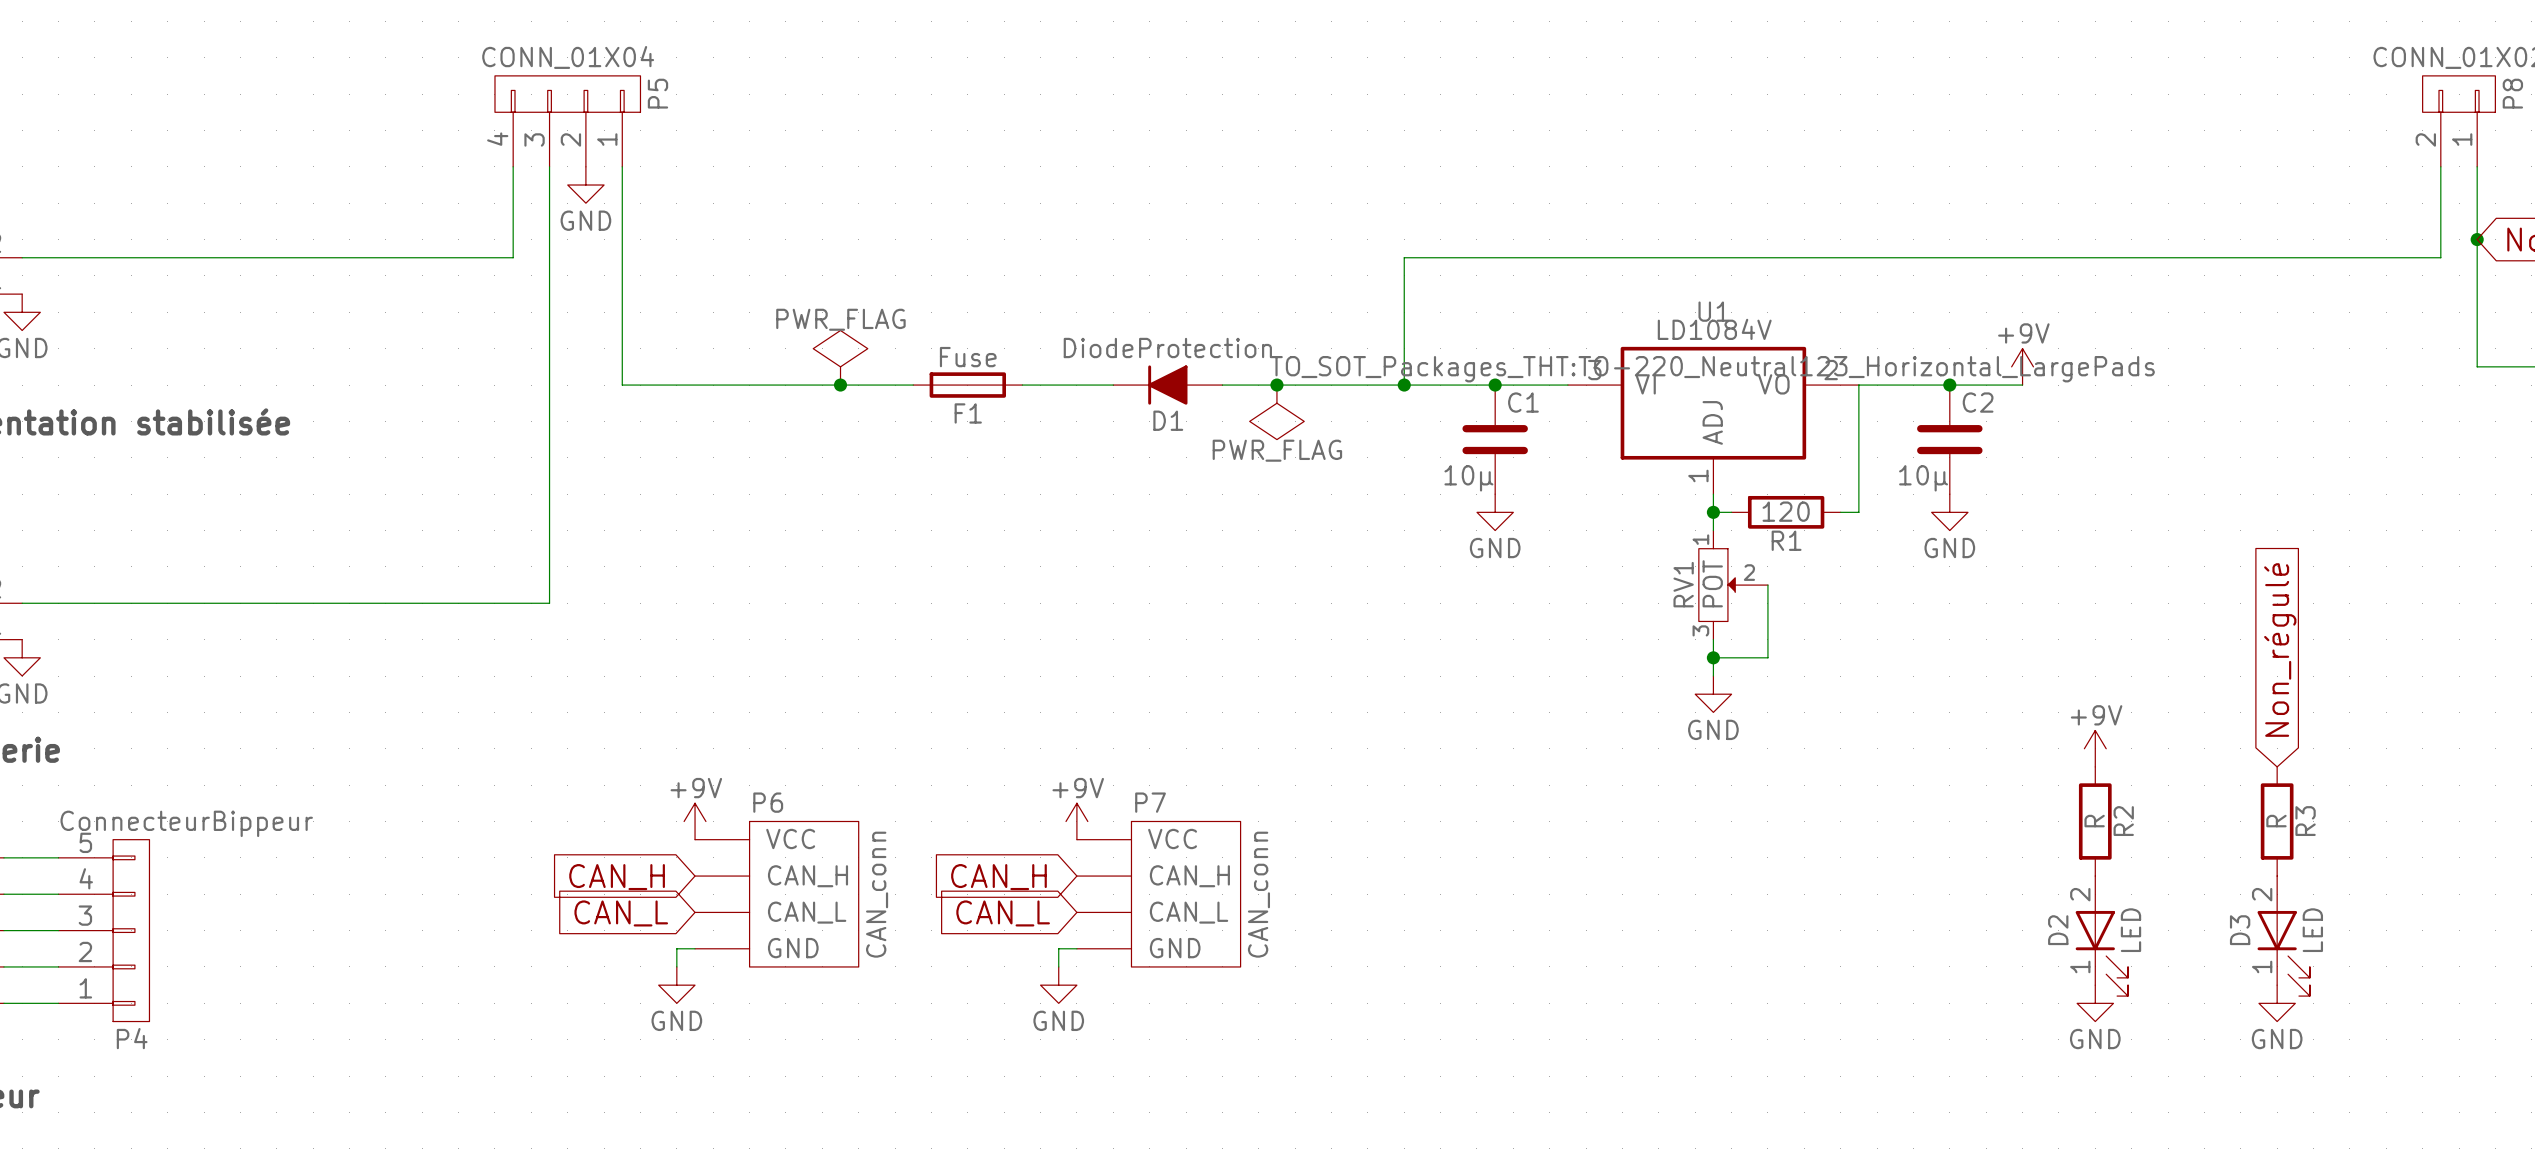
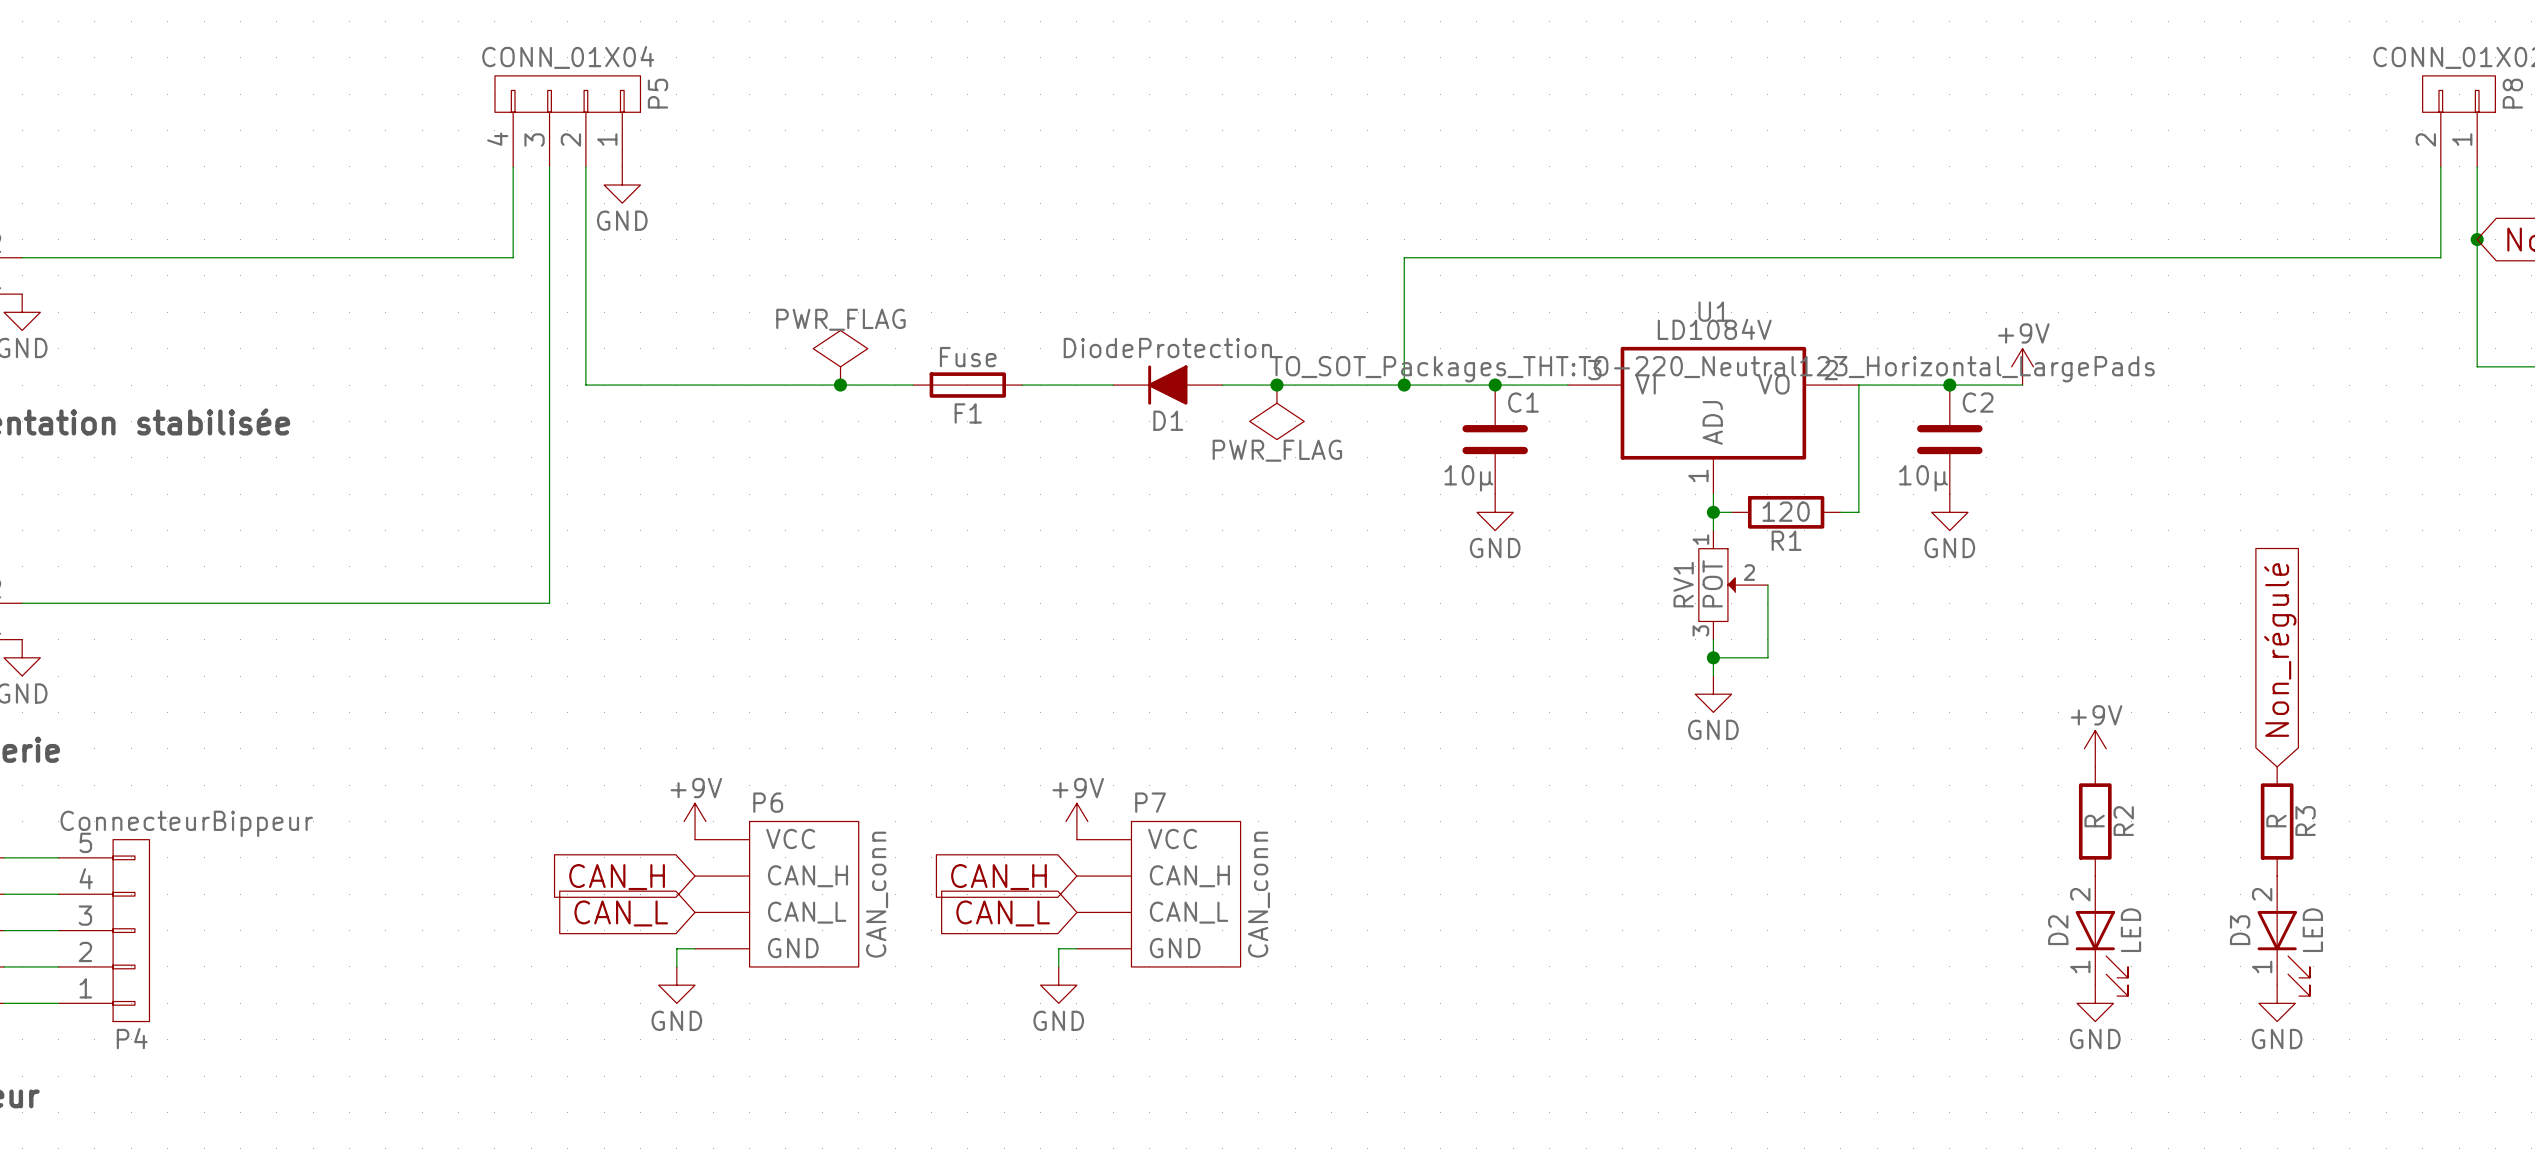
wire: (622, 166) (622, 385) -> (585, 166) (585, 385) (622, 385)
power symbol position: GND (585, 185) -> GND (622, 185)

